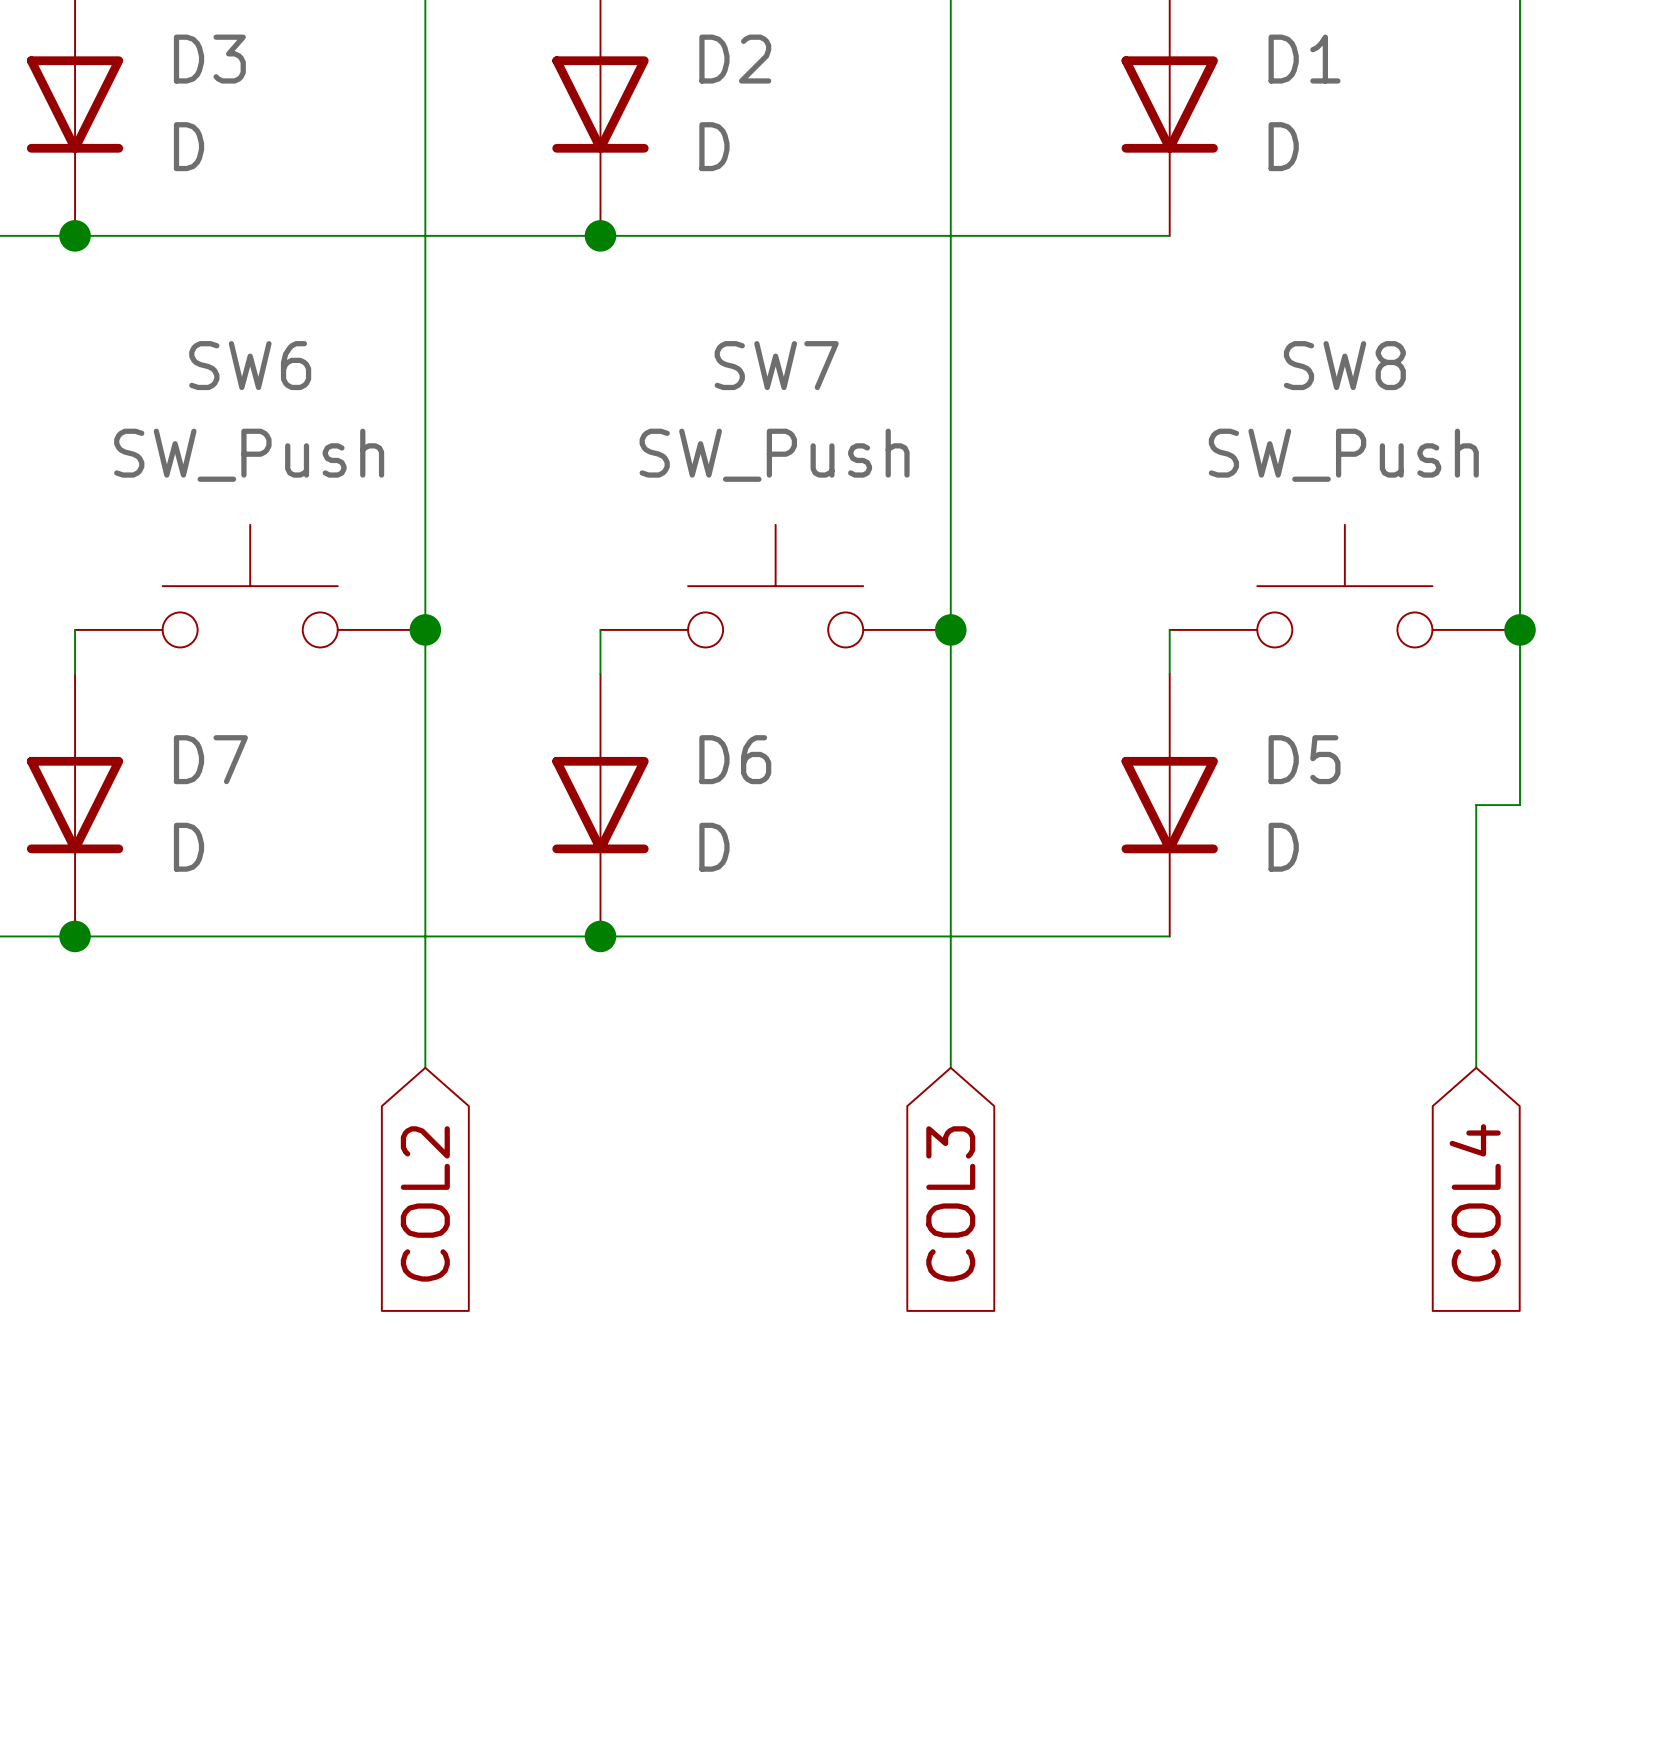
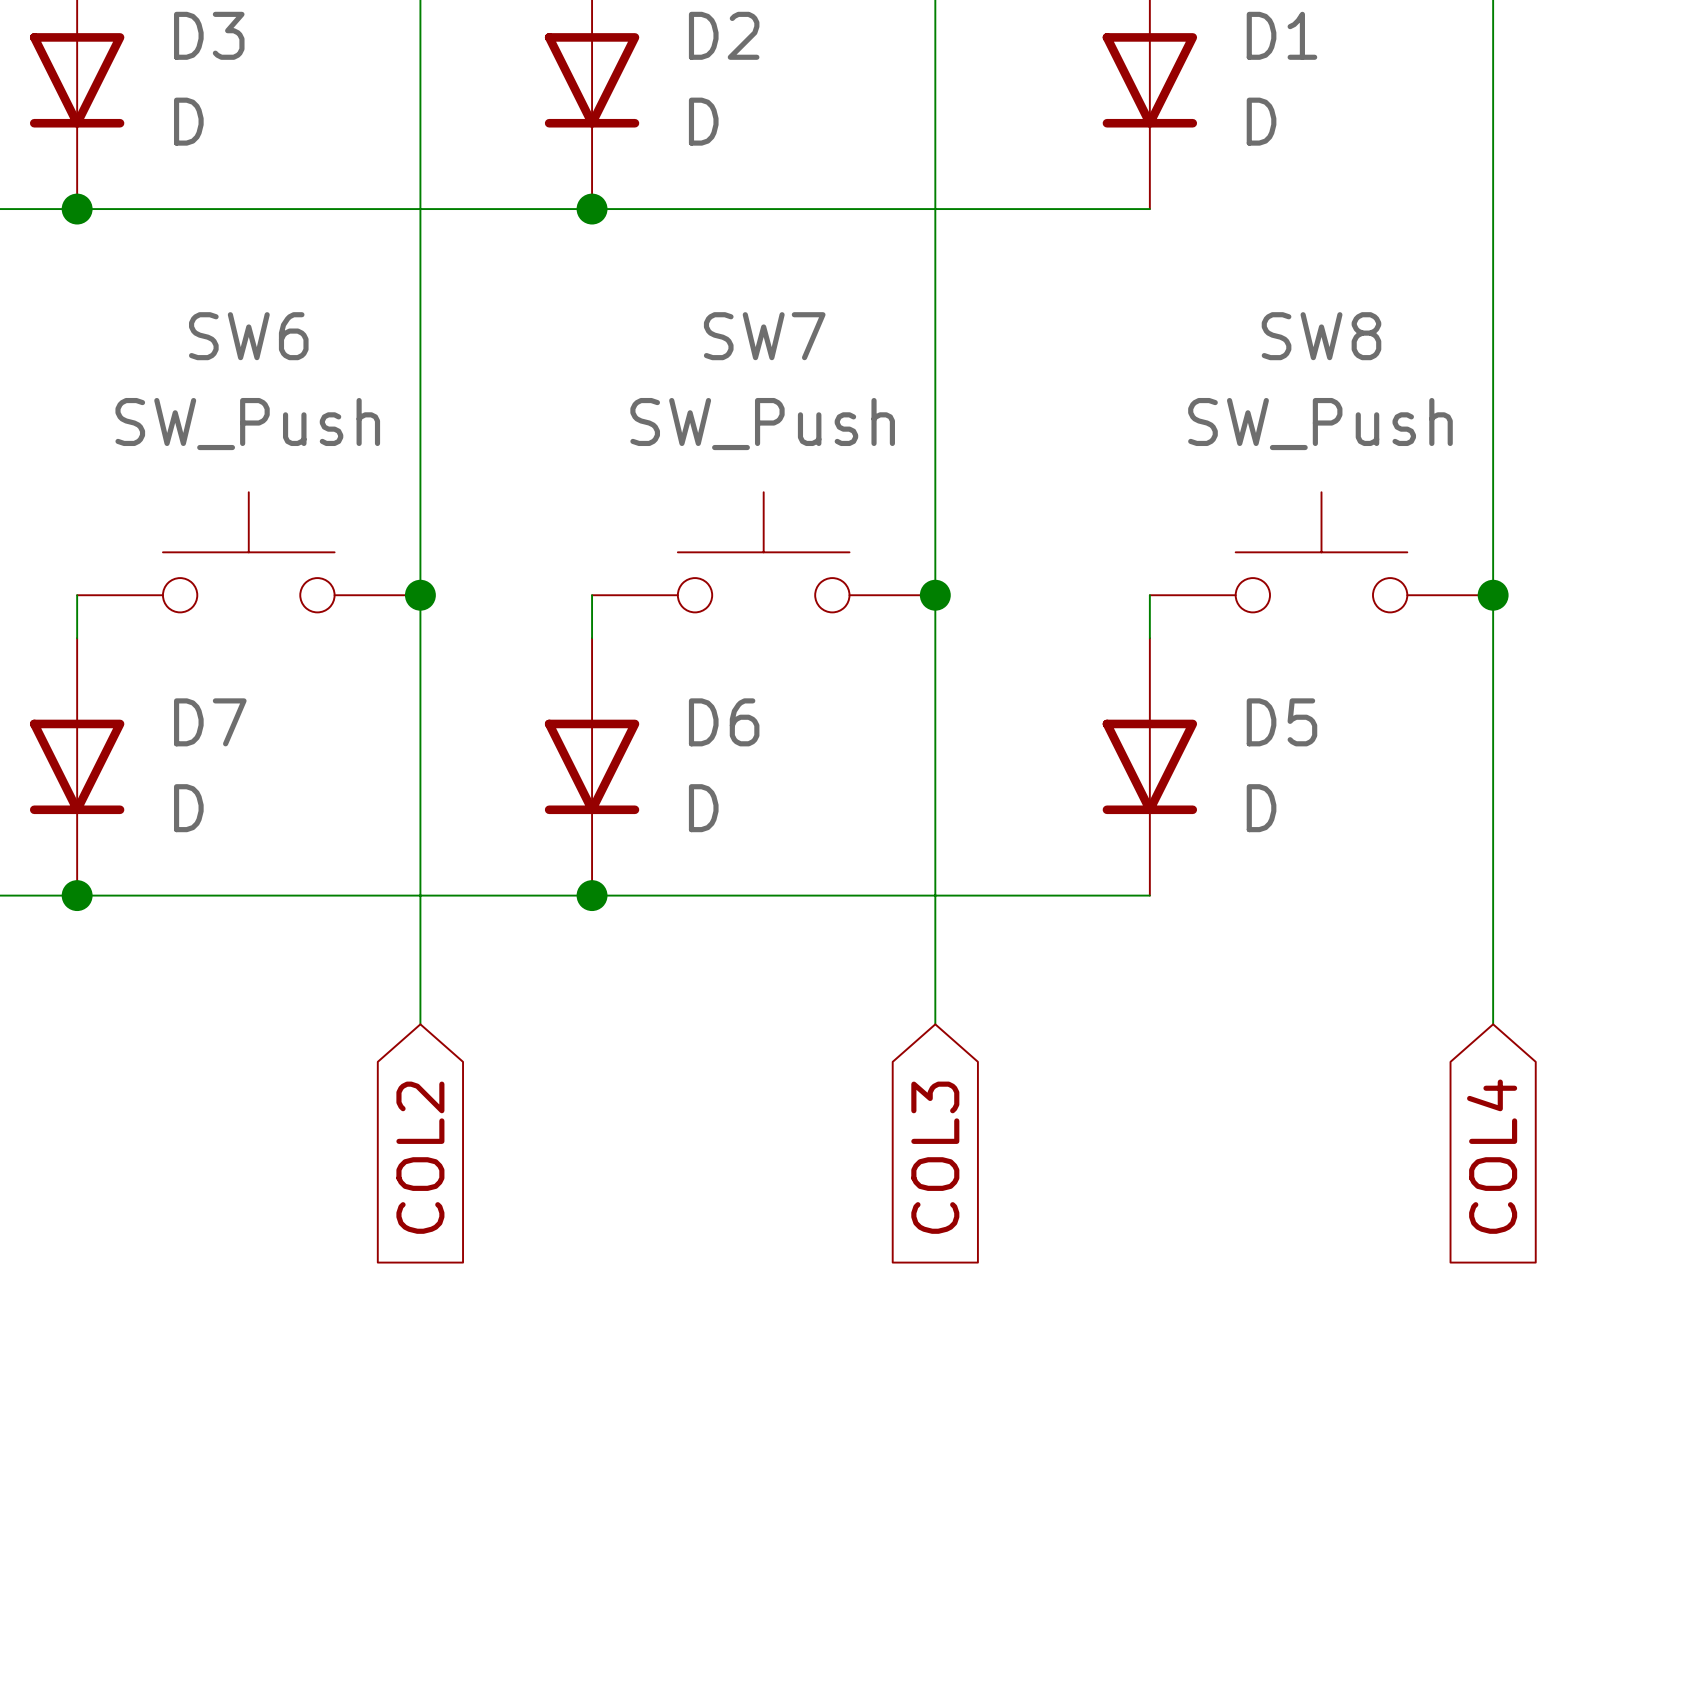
wire: (1520, 805) (1476, 805) (1476, 1067) -> (1493, 766) (1493, 1024)
global label position: COL4 (1475, 1202) -> COL4 (1492, 1156)

